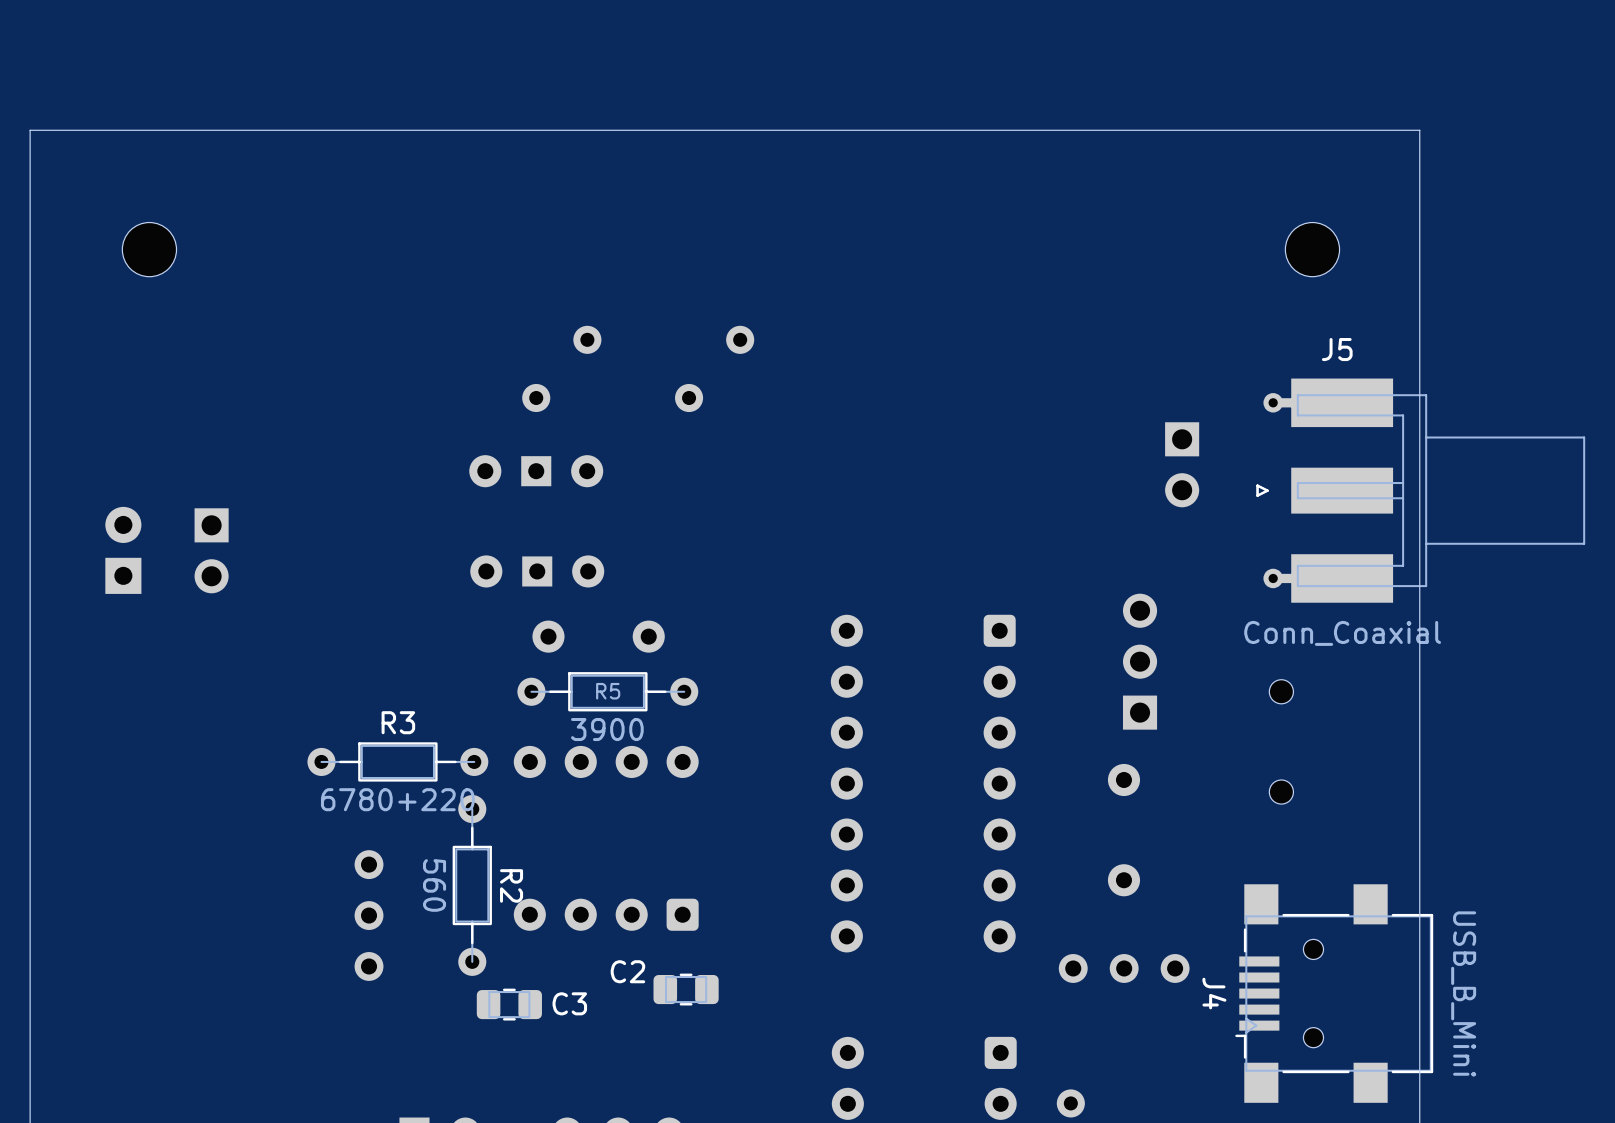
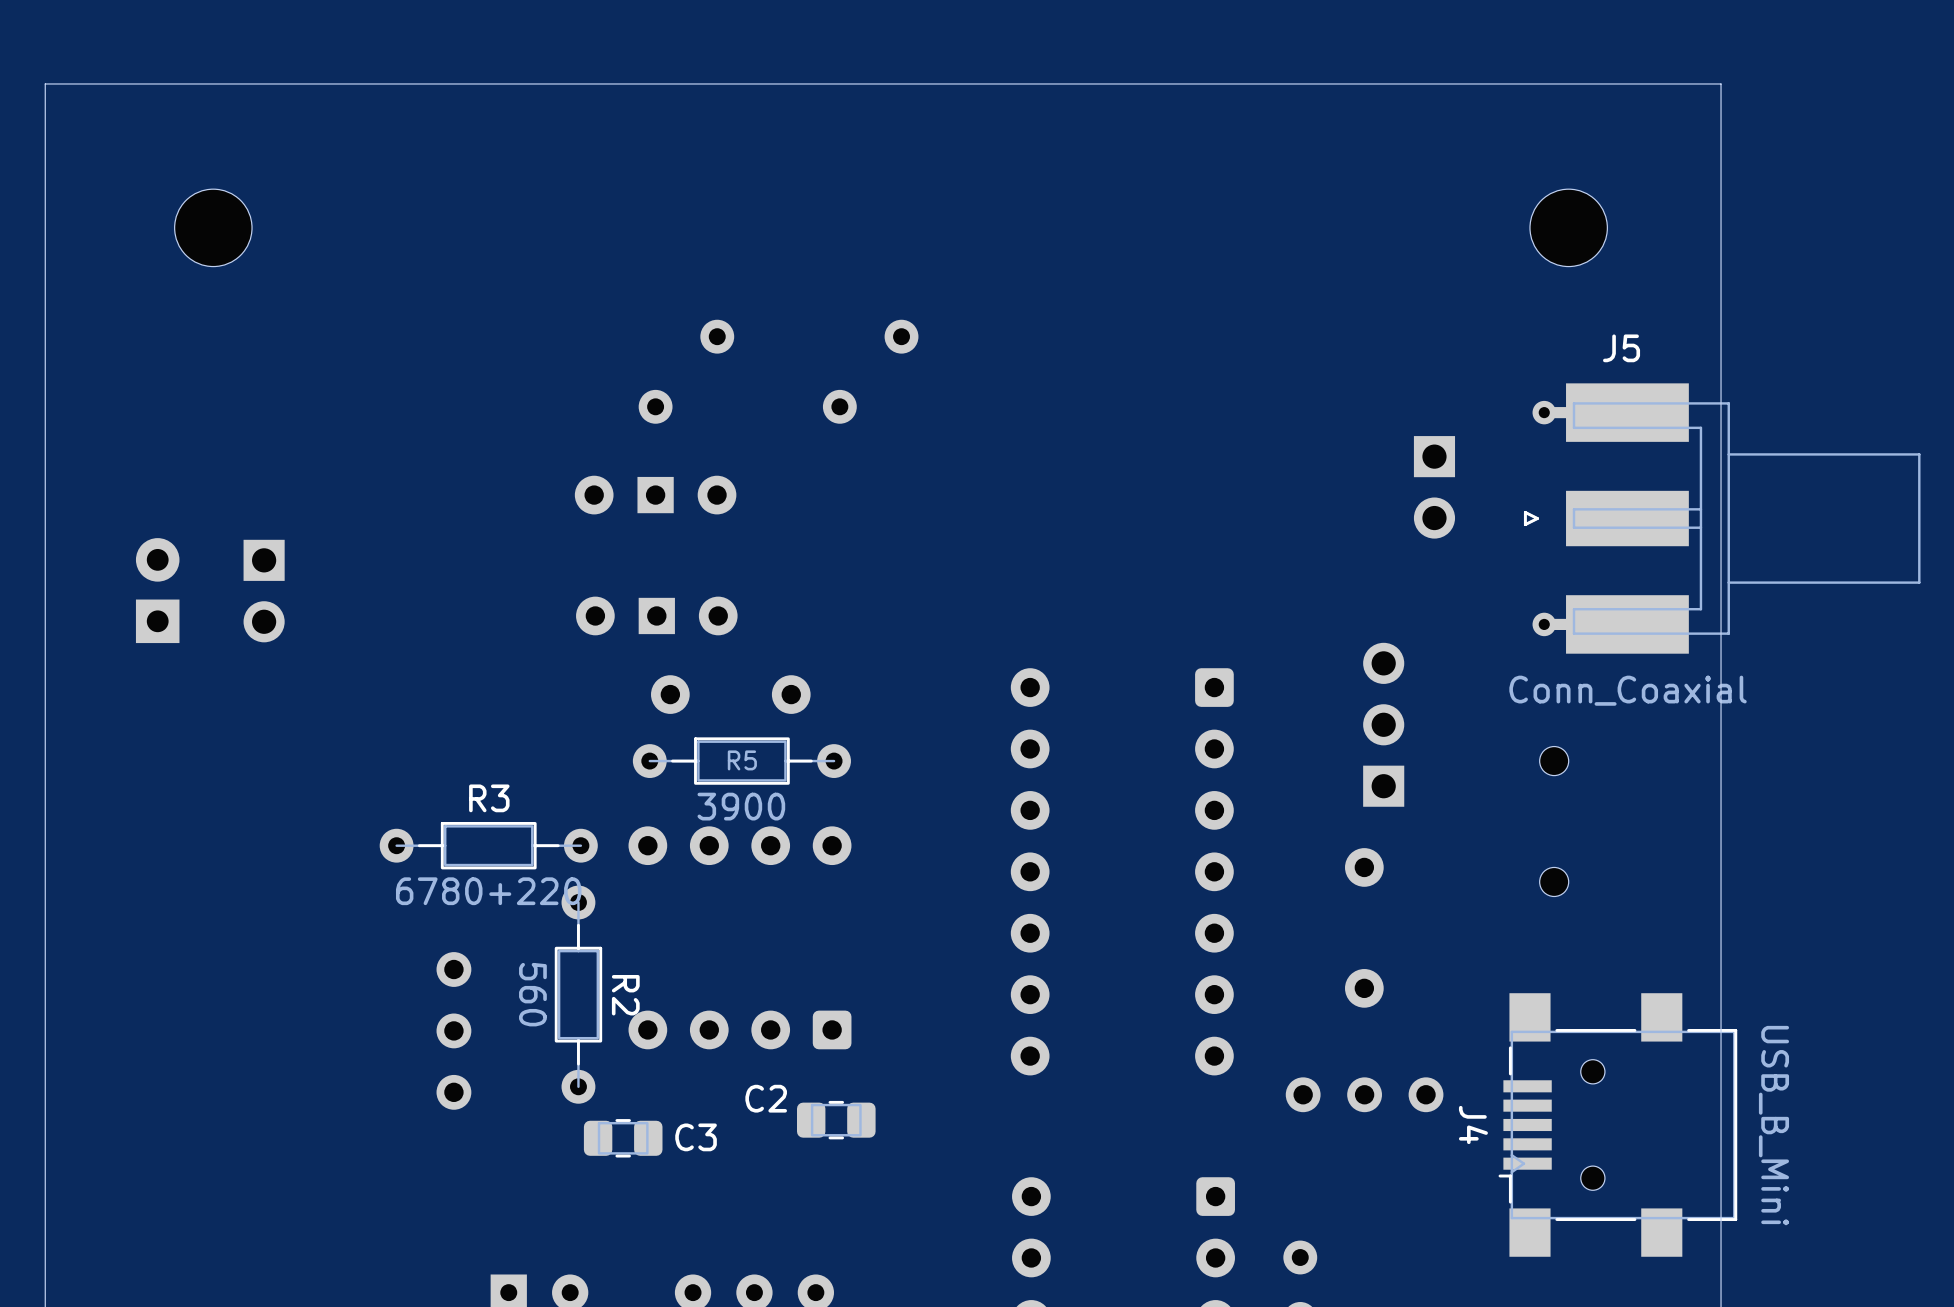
part footprint: [122, 222, 177, 277] -> [174, 189, 253, 267]
part footprint: [1285, 222, 1340, 277] -> [1529, 189, 1608, 267]

